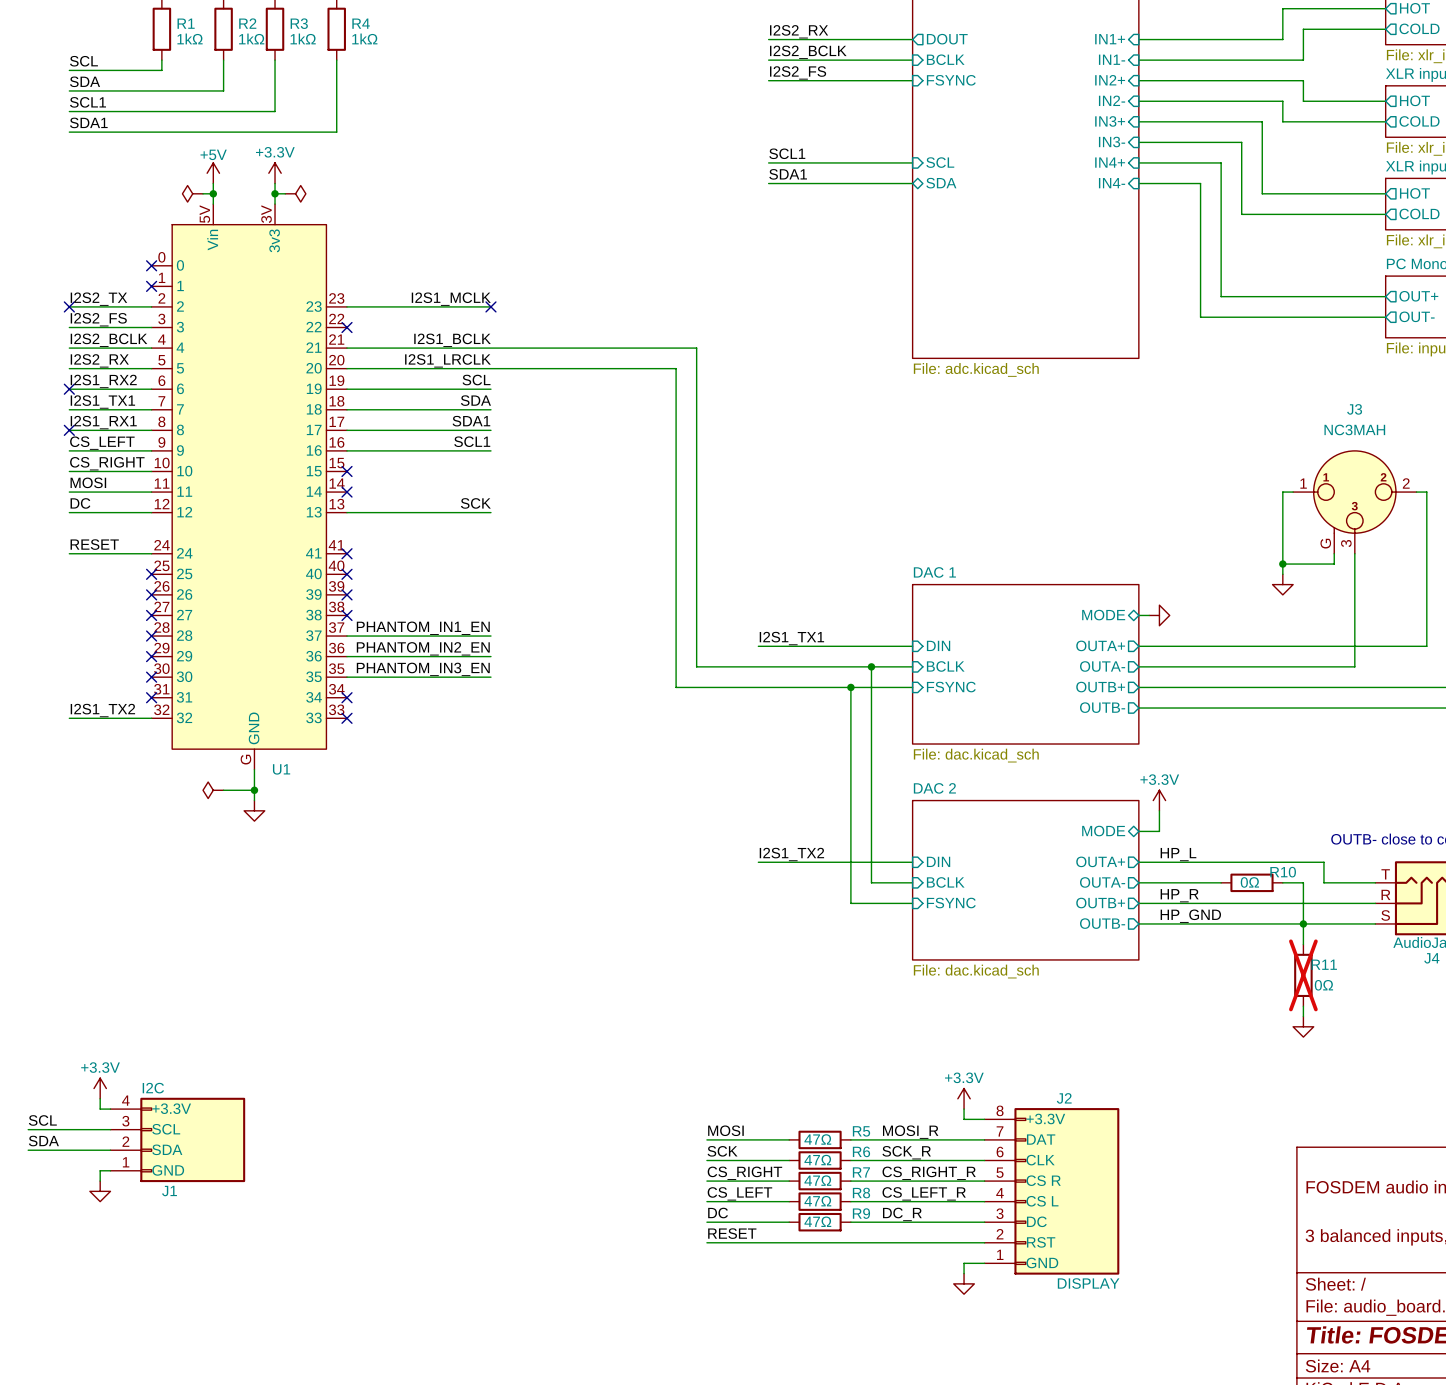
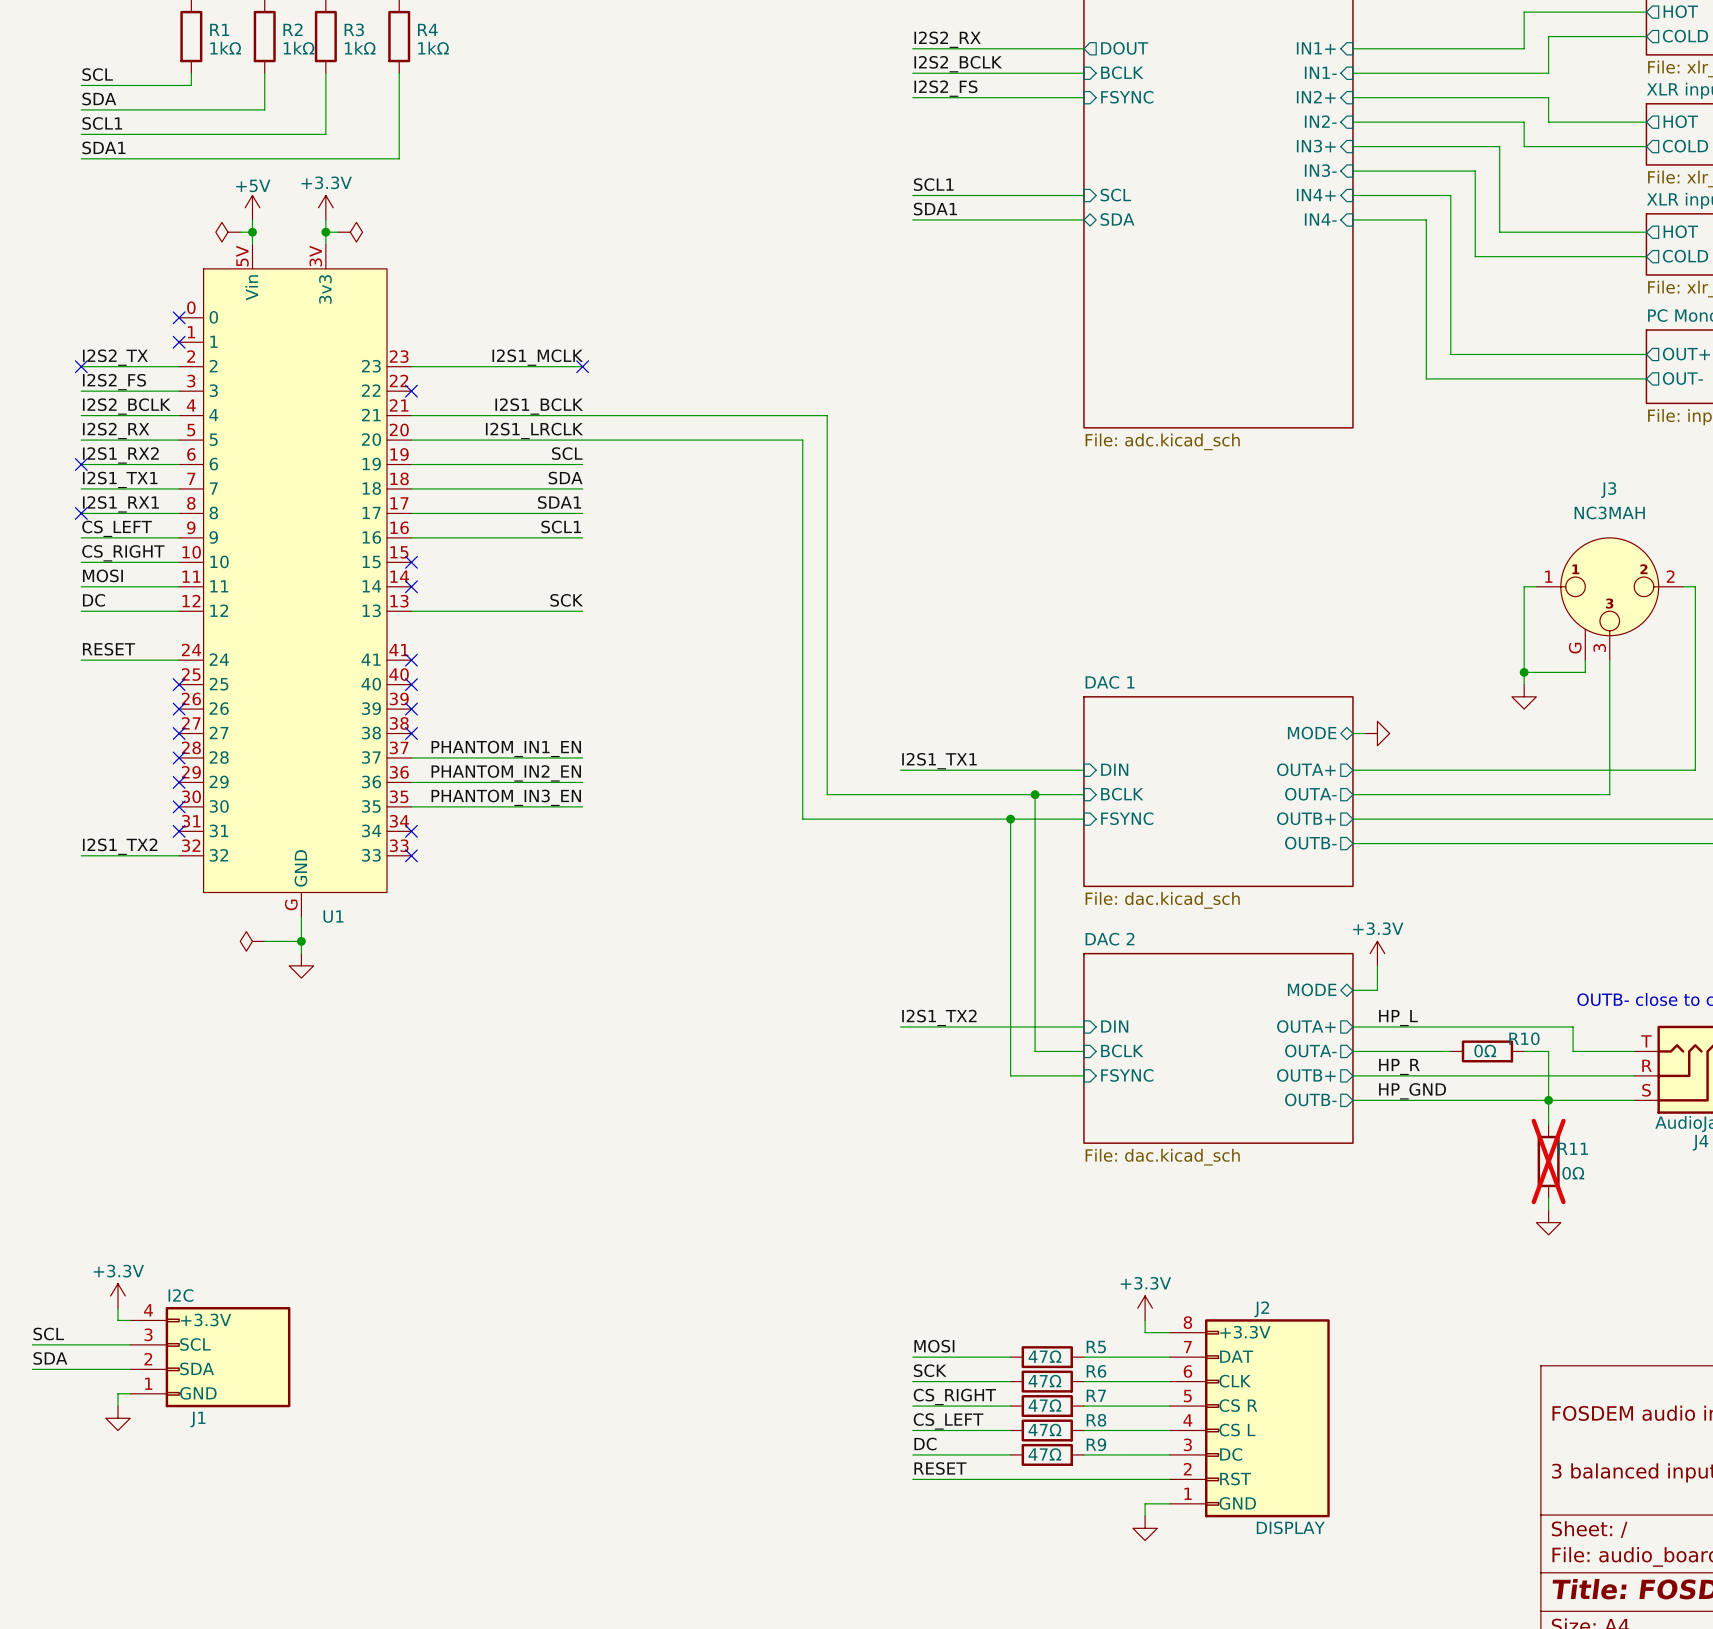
label position: MOSI (725, 1130) -> MOSI (934, 1346)
label: MOSI_R (910, 1132) -> none
wire: (706, 1139) (768, 1139) -> none
R5 position: (820, 1139) -> (1047, 1357)
wire: (850, 1139) (912, 1139) -> (1010, 1357) (937, 1357)
label position: SCK (722, 1151) -> SCK (930, 1370)
label: SCK_R (906, 1152) -> none
wire: (706, 1160) (768, 1160) -> none
R6 position: (820, 1160) -> (1047, 1381)
wire: (850, 1160) (912, 1160) -> (1010, 1381) (937, 1381)
label position: CS_RIGHT (744, 1173) -> CS_RIGHT (954, 1397)
label: CS_RIGHT_R (929, 1173) -> none
wire: (706, 1181) (768, 1181) -> none
R7 position: (820, 1181) -> (1047, 1406)
wire: (850, 1181) (912, 1181) -> (1010, 1406) (937, 1406)
label position: CS_LEFT (739, 1193) -> CS_LEFT (948, 1421)
label: CS_LEFT_R (924, 1193) -> none
wire: (706, 1201) (768, 1201) -> none
R8 position: (820, 1201) -> (1047, 1430)
wire: (850, 1201) (912, 1201) -> (1010, 1430) (937, 1430)
label position: DC (718, 1213) -> DC (925, 1444)
label: DC_R (902, 1214) -> none
wire: (706, 1222) (768, 1222) -> none
R9 position: (820, 1222) -> (1047, 1454)
wire: (850, 1222) (912, 1222) -> (1010, 1454) (937, 1454)
label position: RESET (732, 1233) -> RESET (940, 1468)
wire: (706, 1242) (768, 1242) -> none

